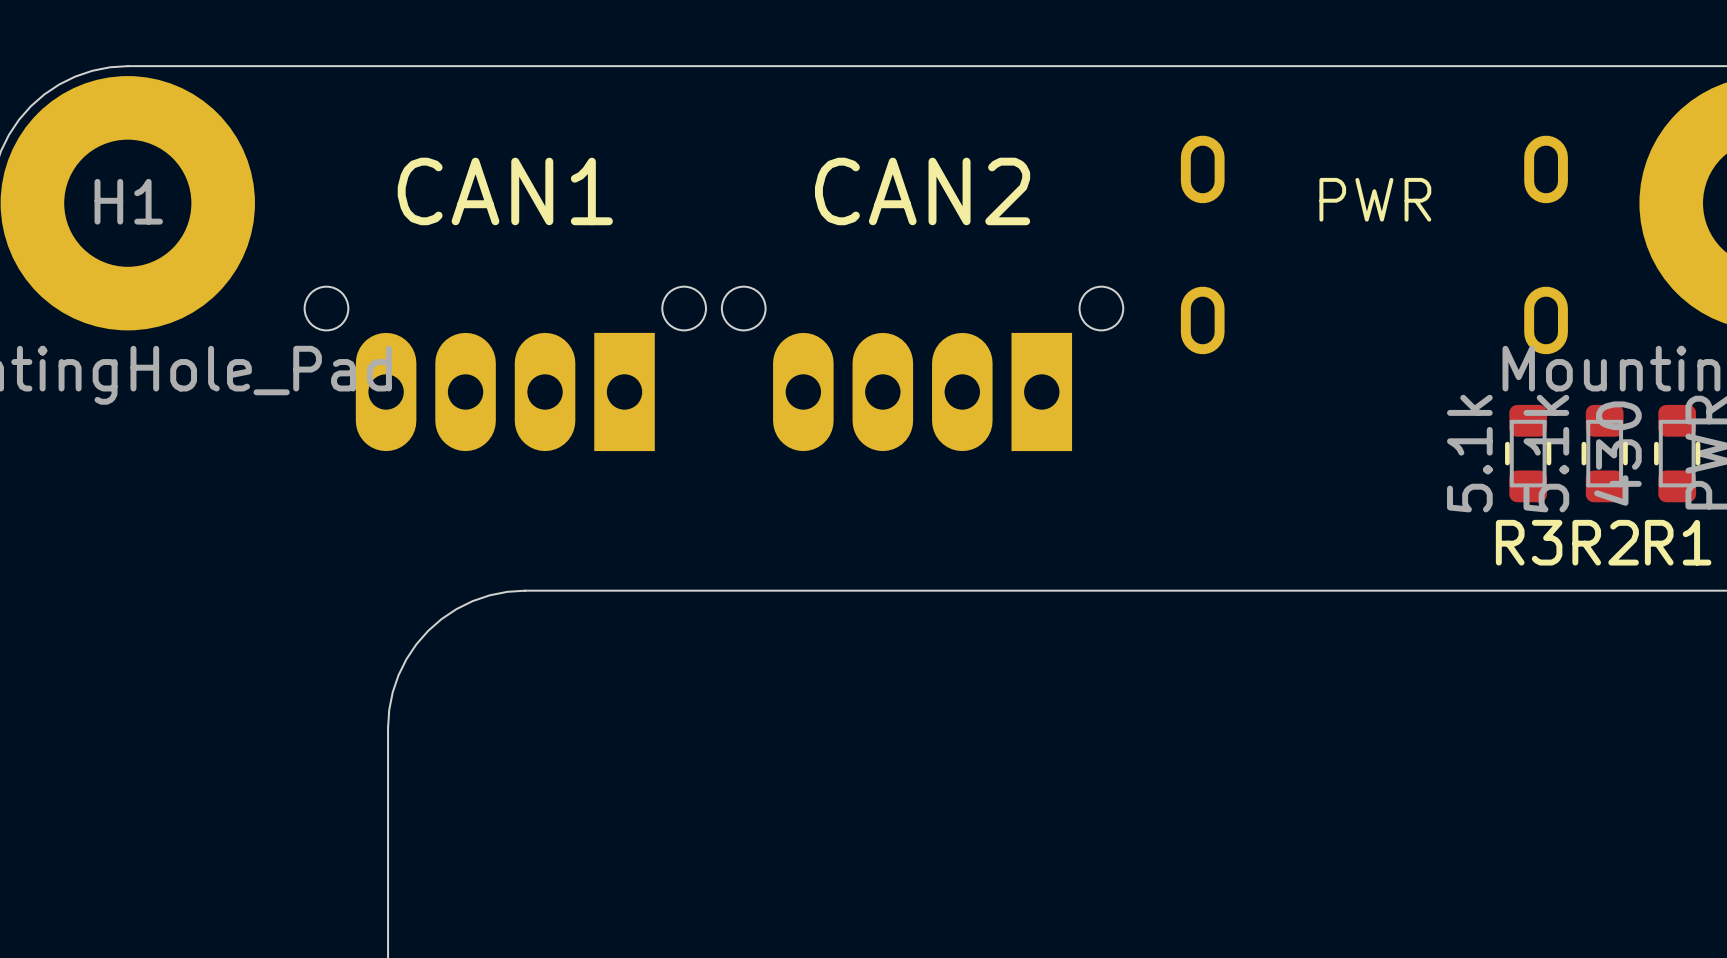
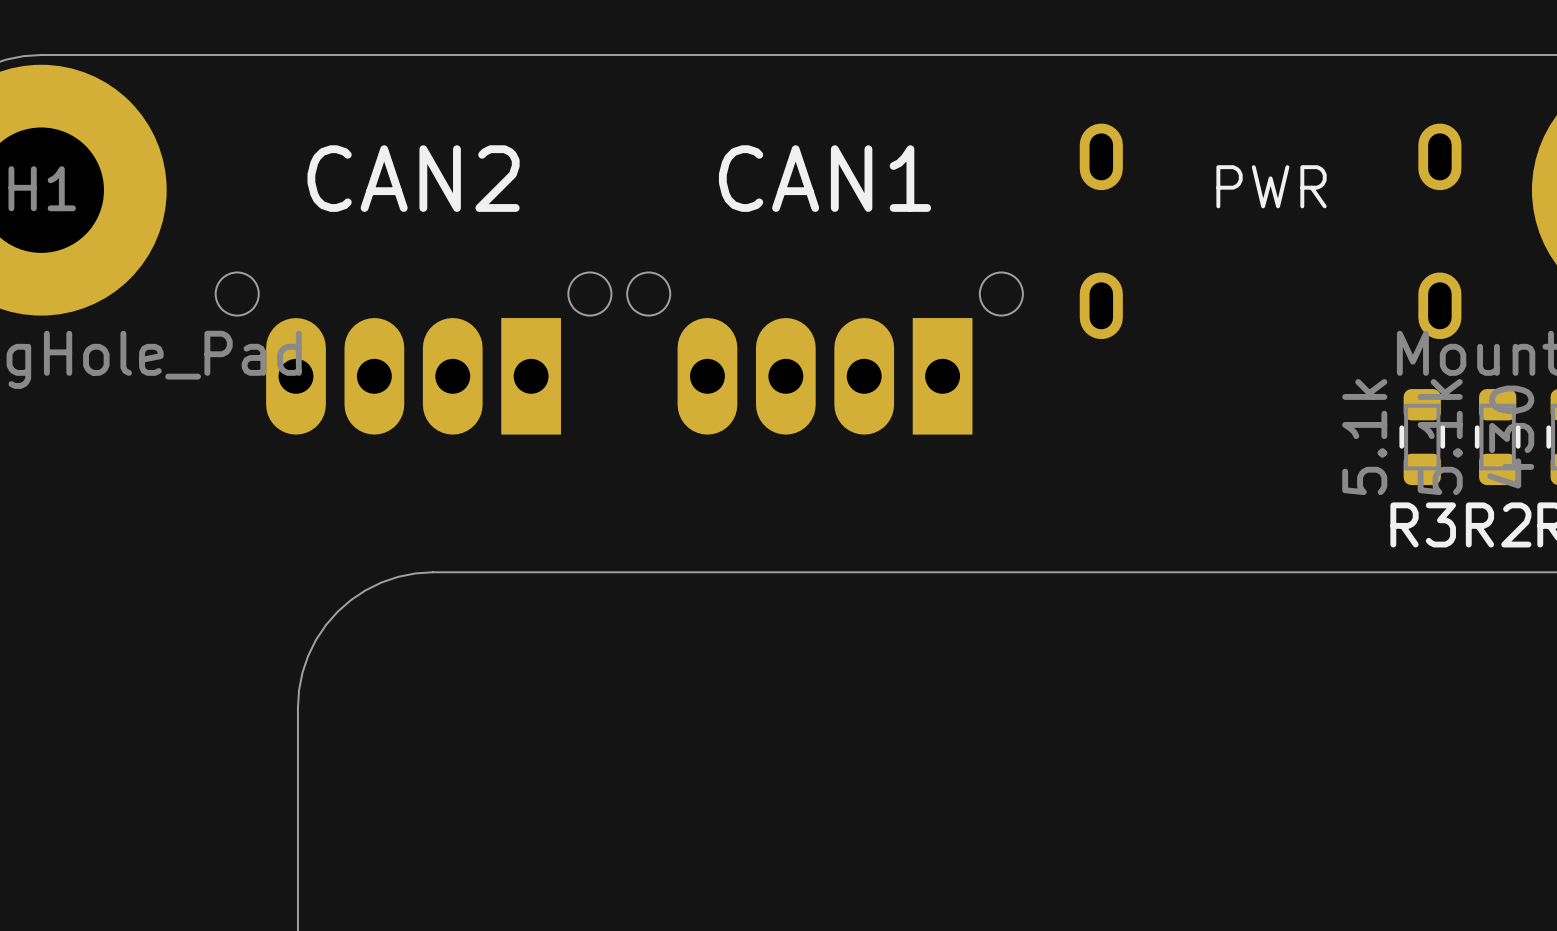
text: CAN1 (505, 191) -> CAN2 (413, 178)
text: CAN2 (922, 191) -> CAN1 (825, 178)

